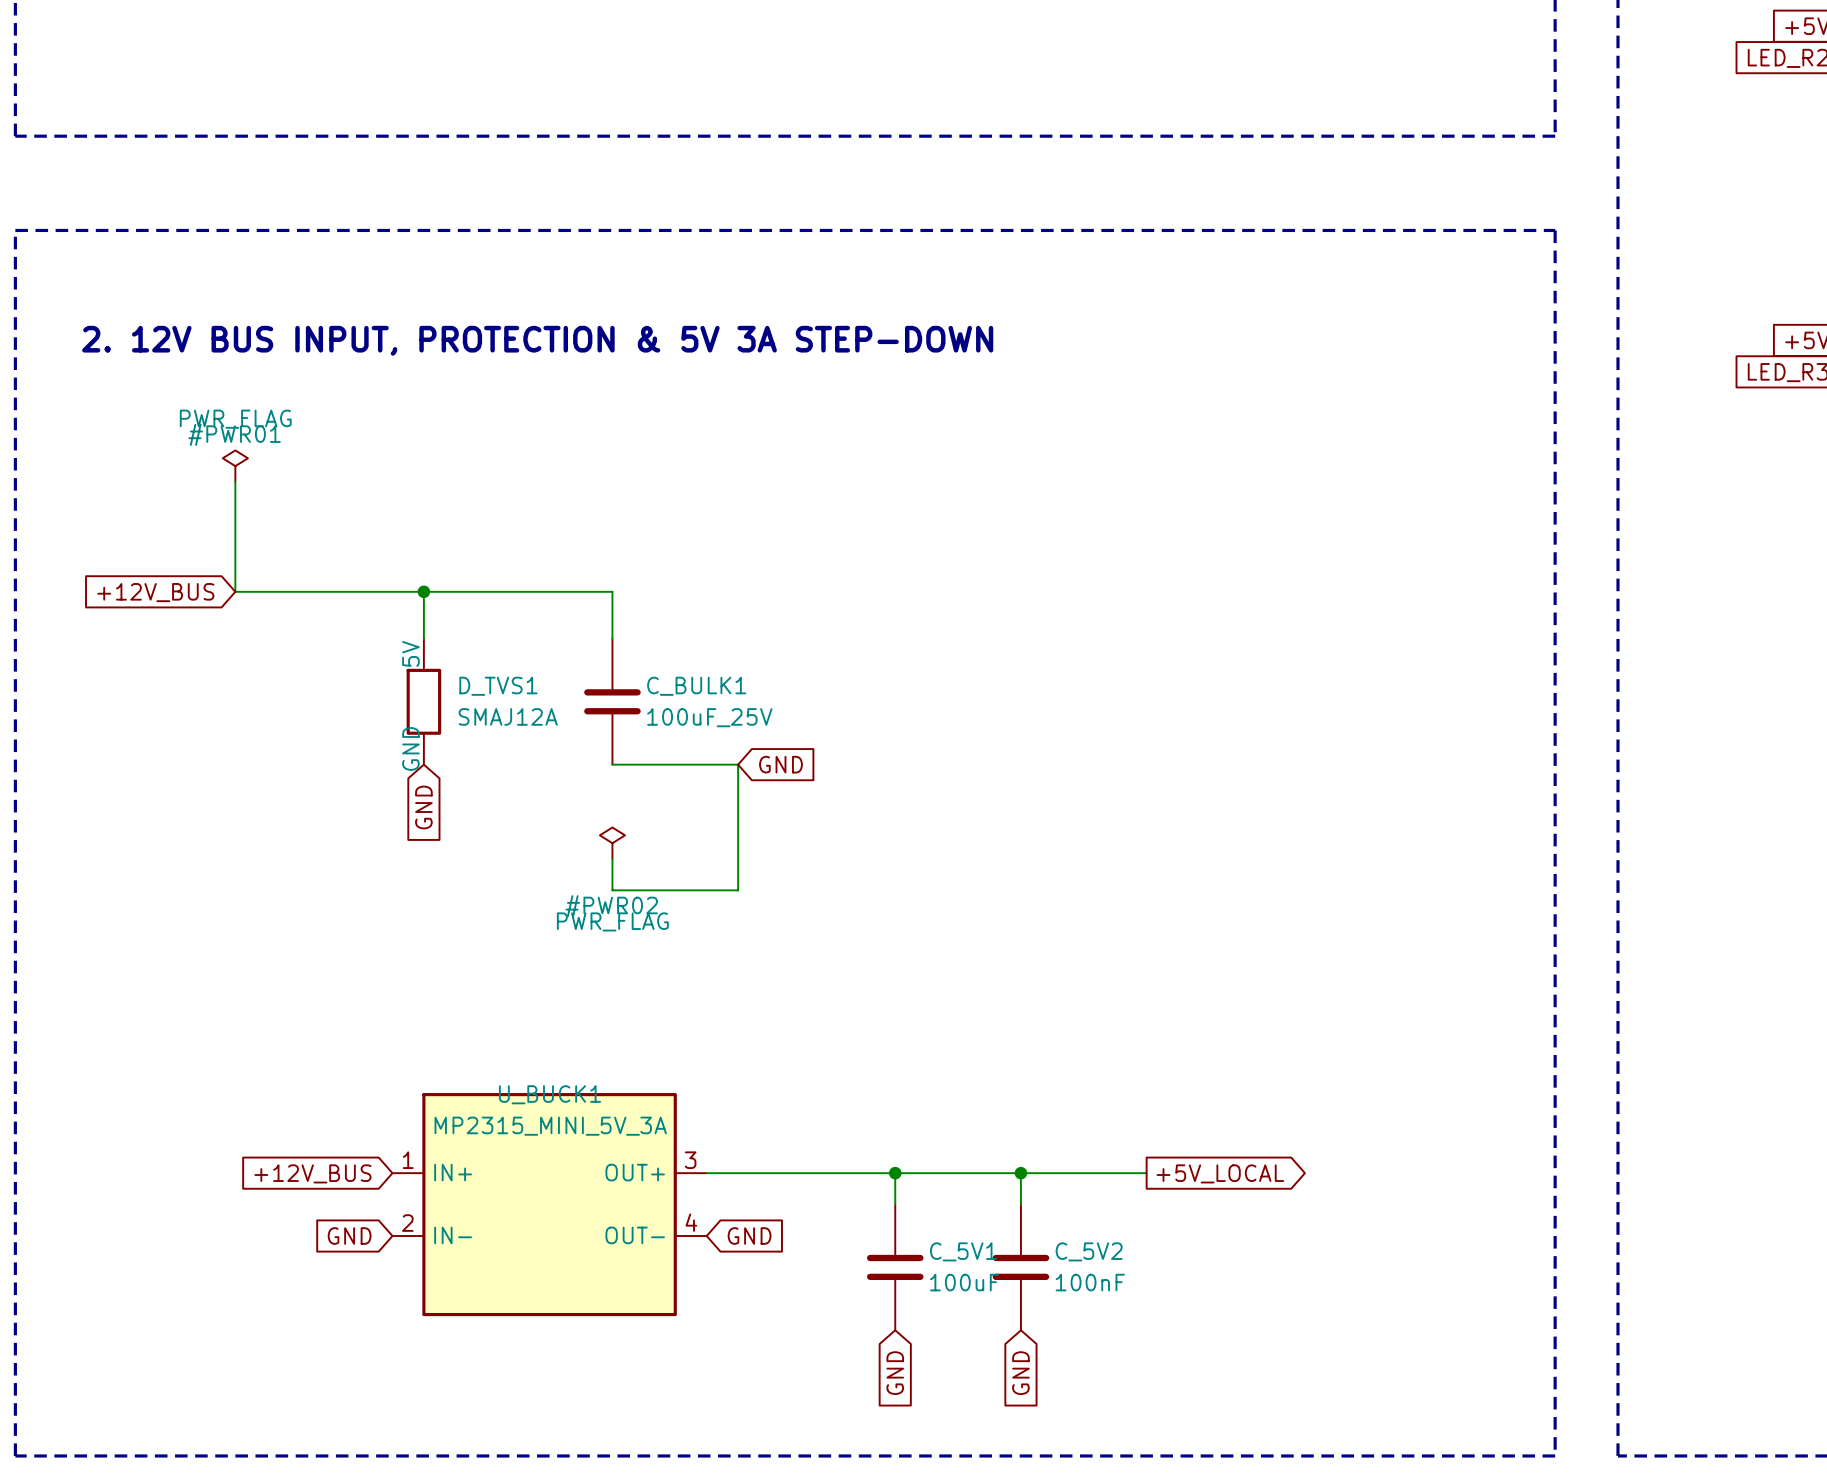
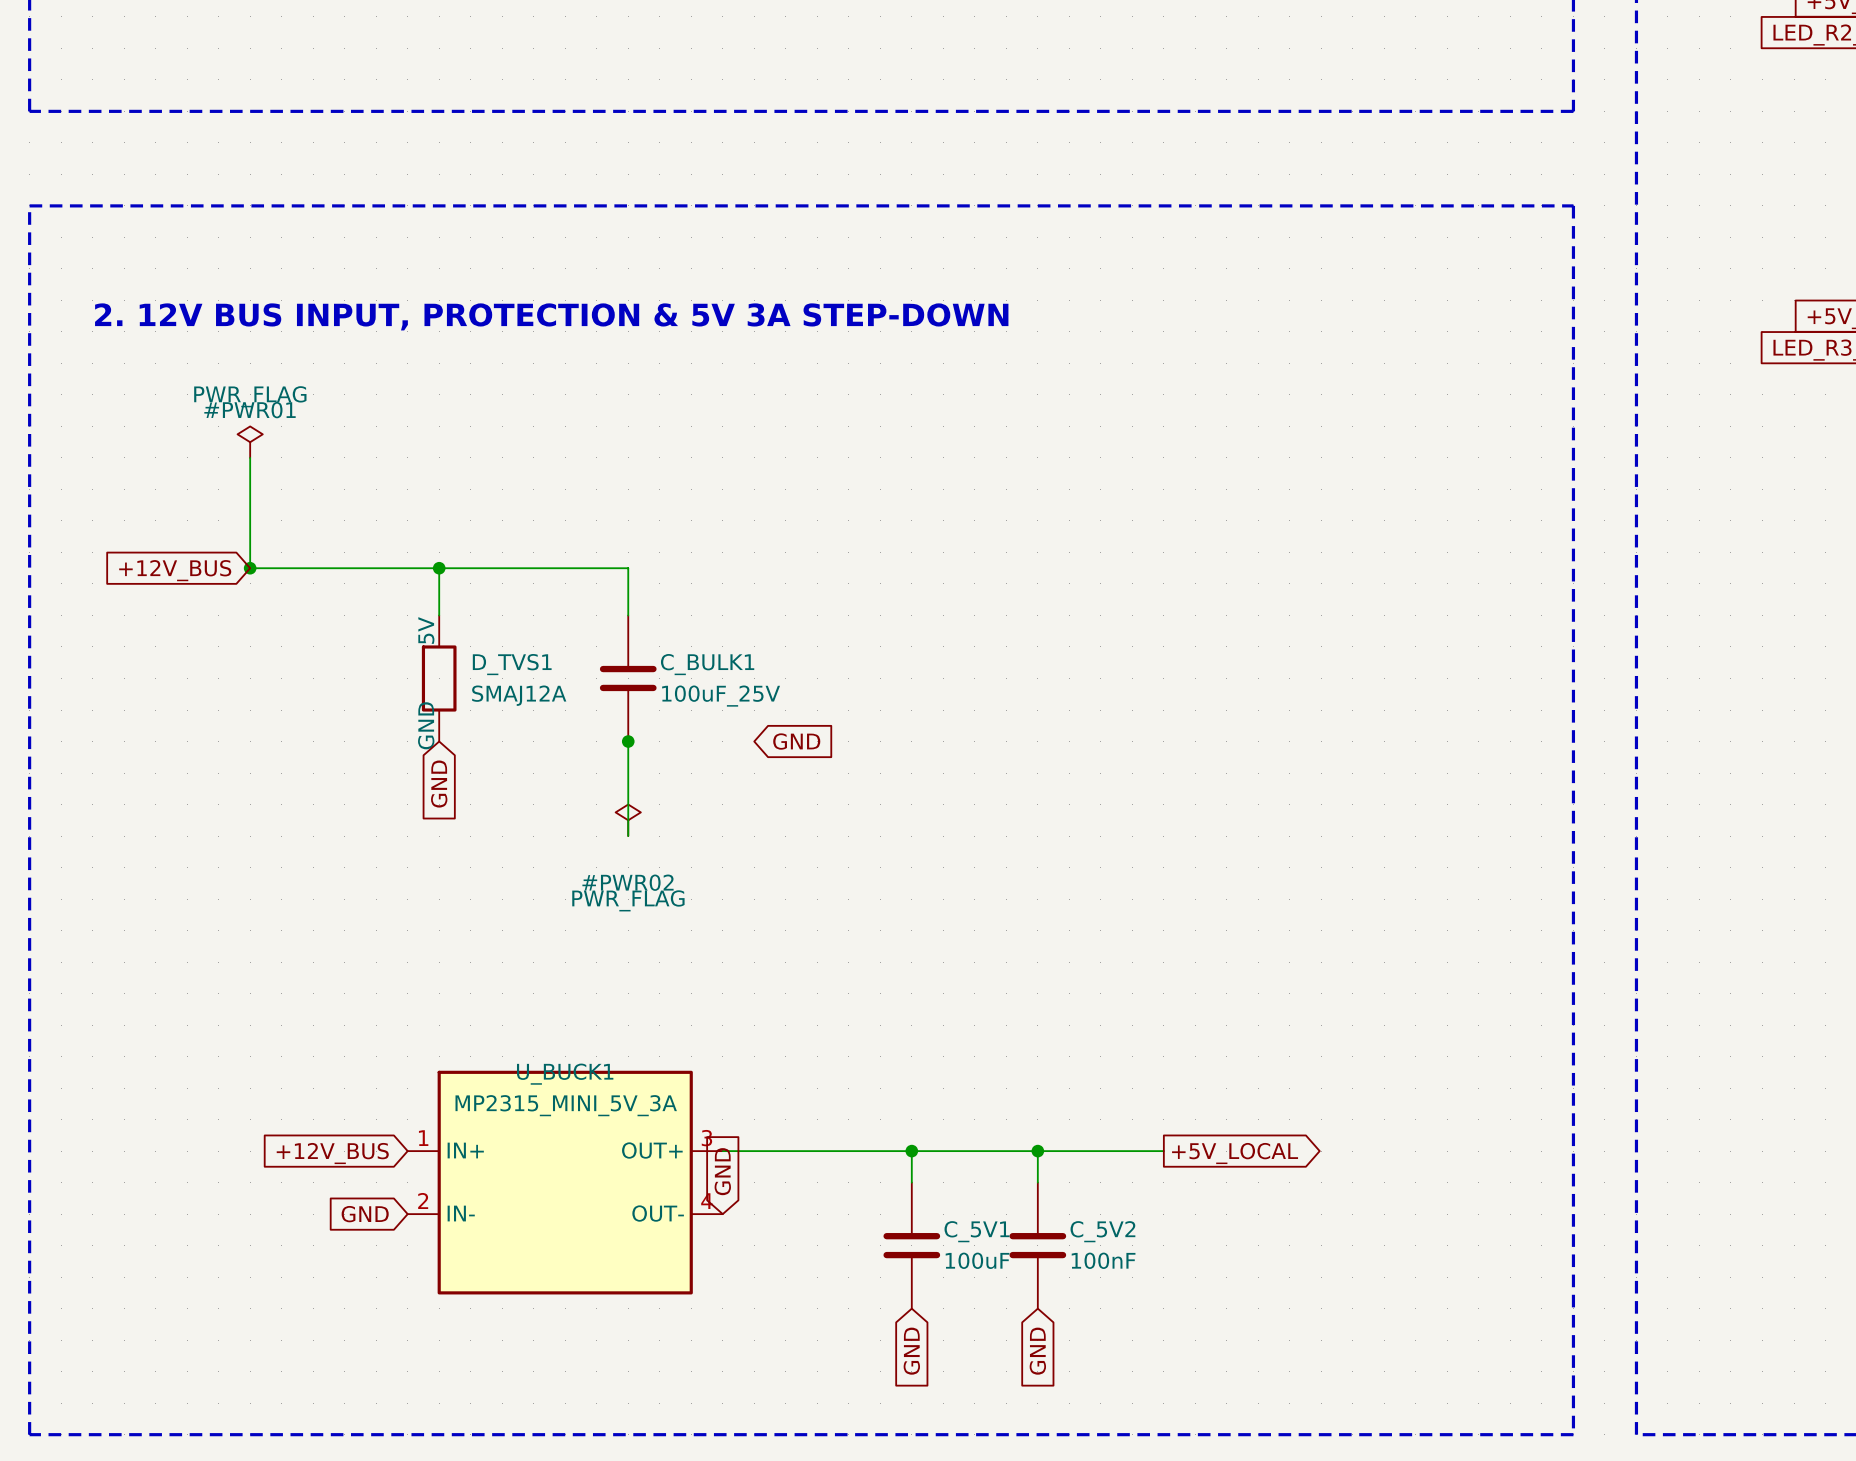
junction: none -> (250, 568)
wire: (612, 764) (738, 764) (738, 890) (612, 890) (612, 858) -> (628, 741) (628, 836)
junction: none -> (628, 741)
global label rotation: 0° (749, 1236) -> 90° counterclockwise (722, 1171)

